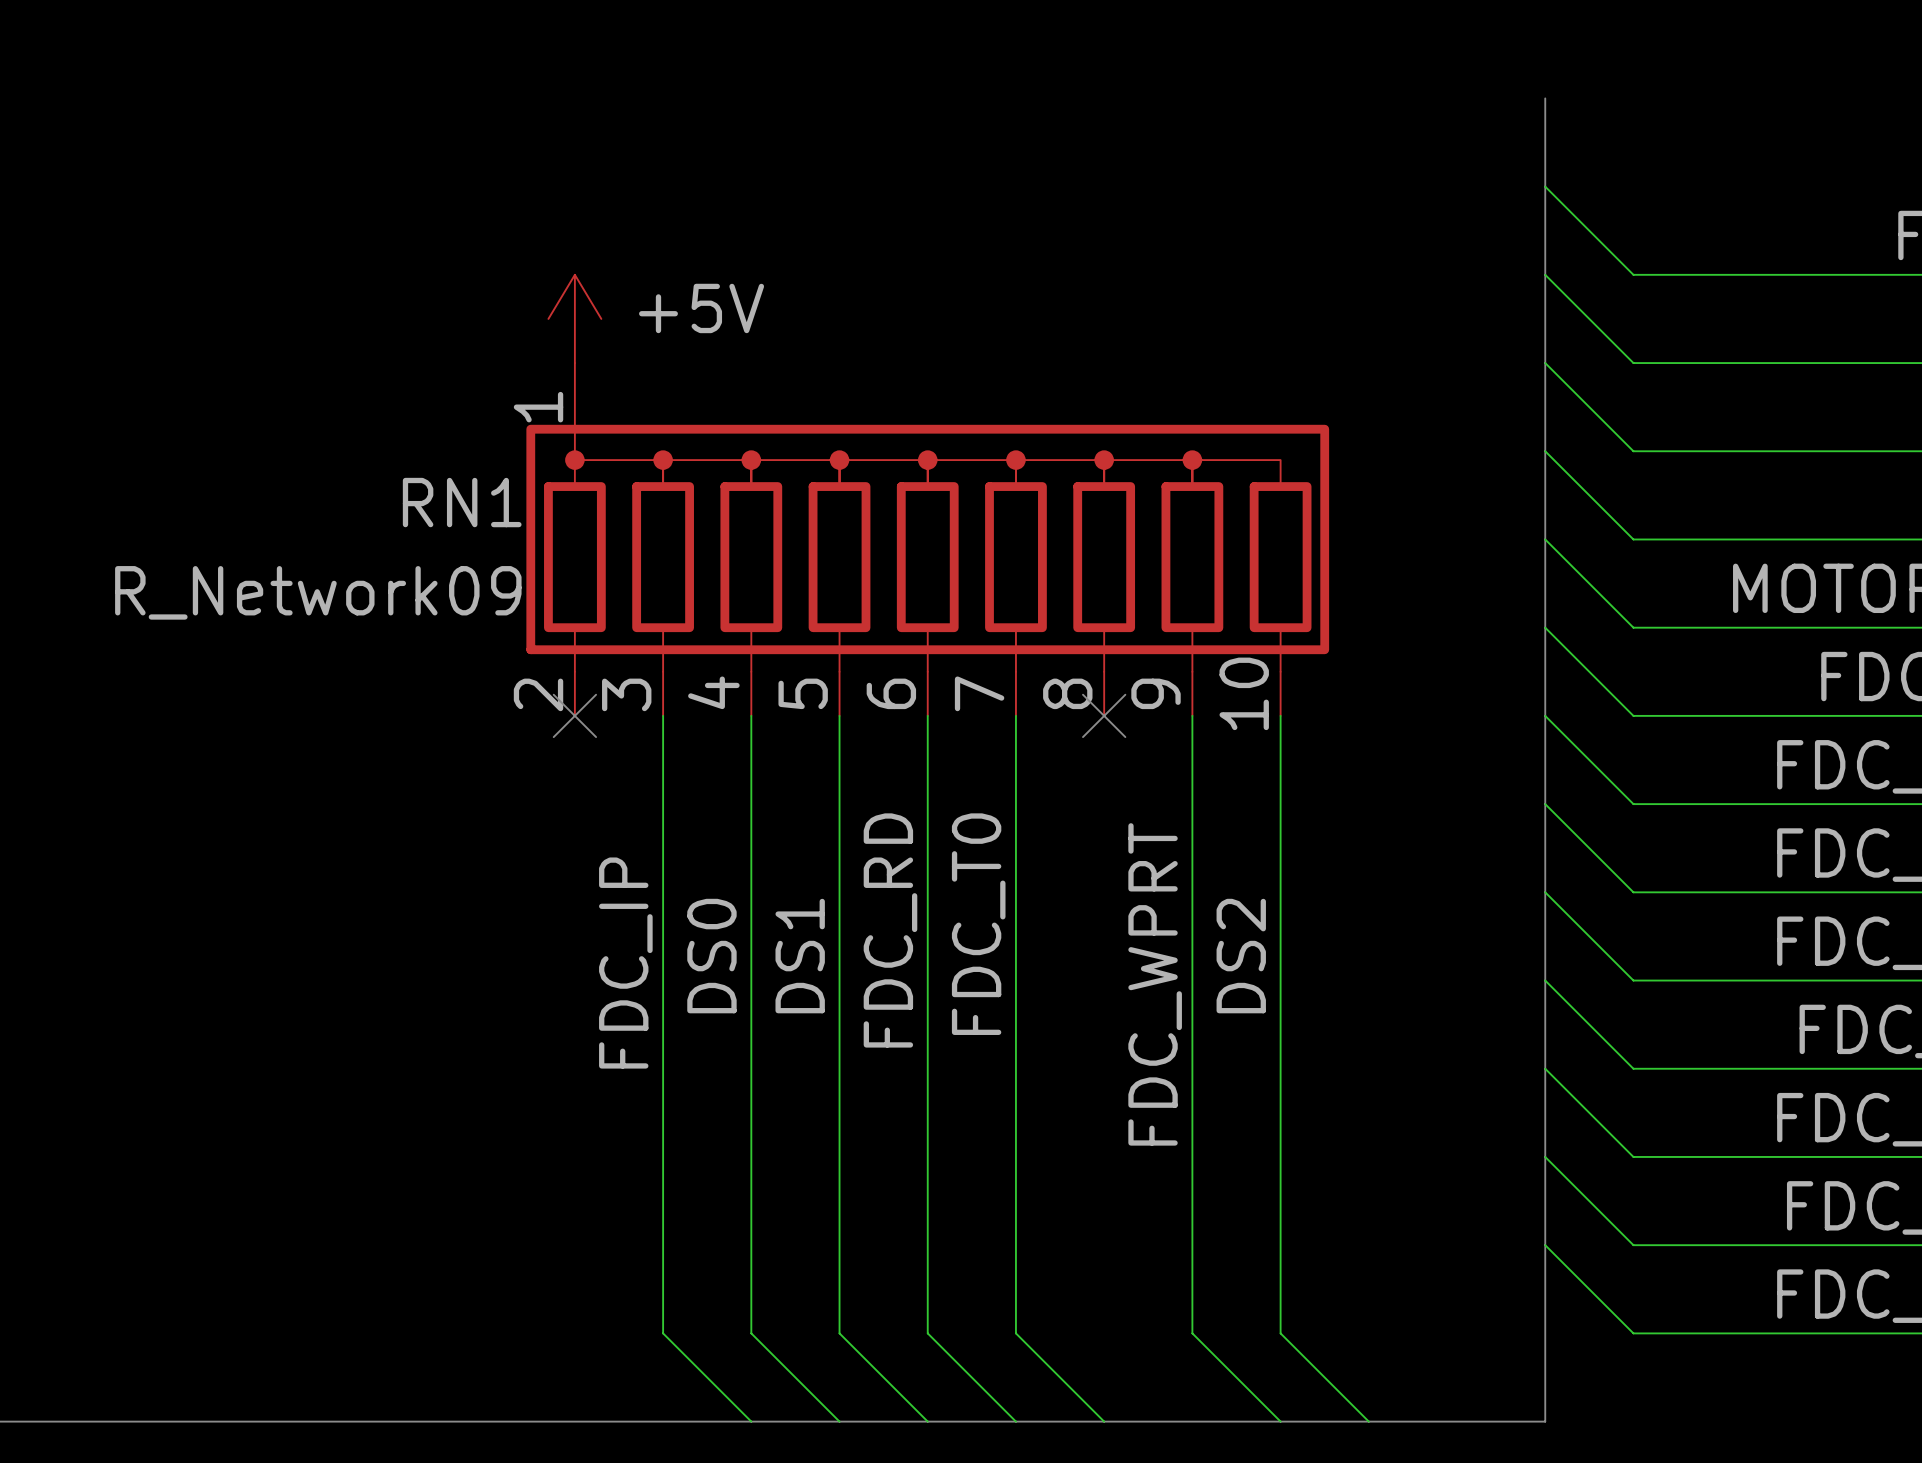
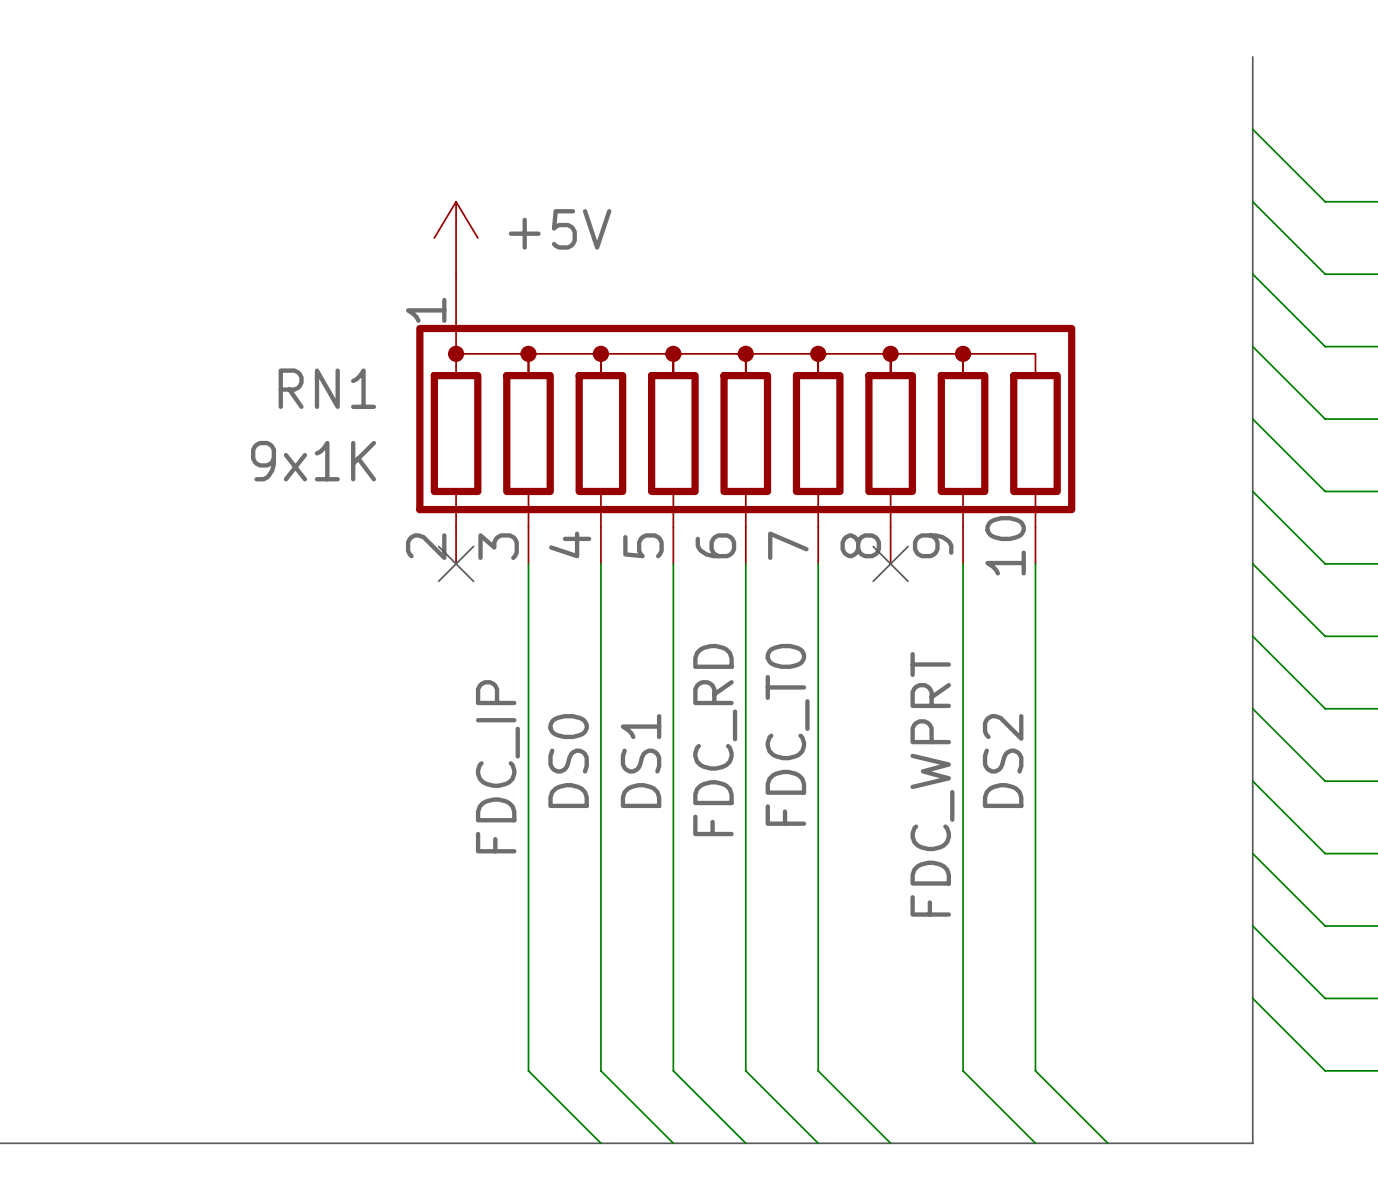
RN1 name position: RN1 (462, 502) -> RN1 (327, 388)
RN1 value: R_Network09 (318, 592) -> 9x1K (313, 461)

